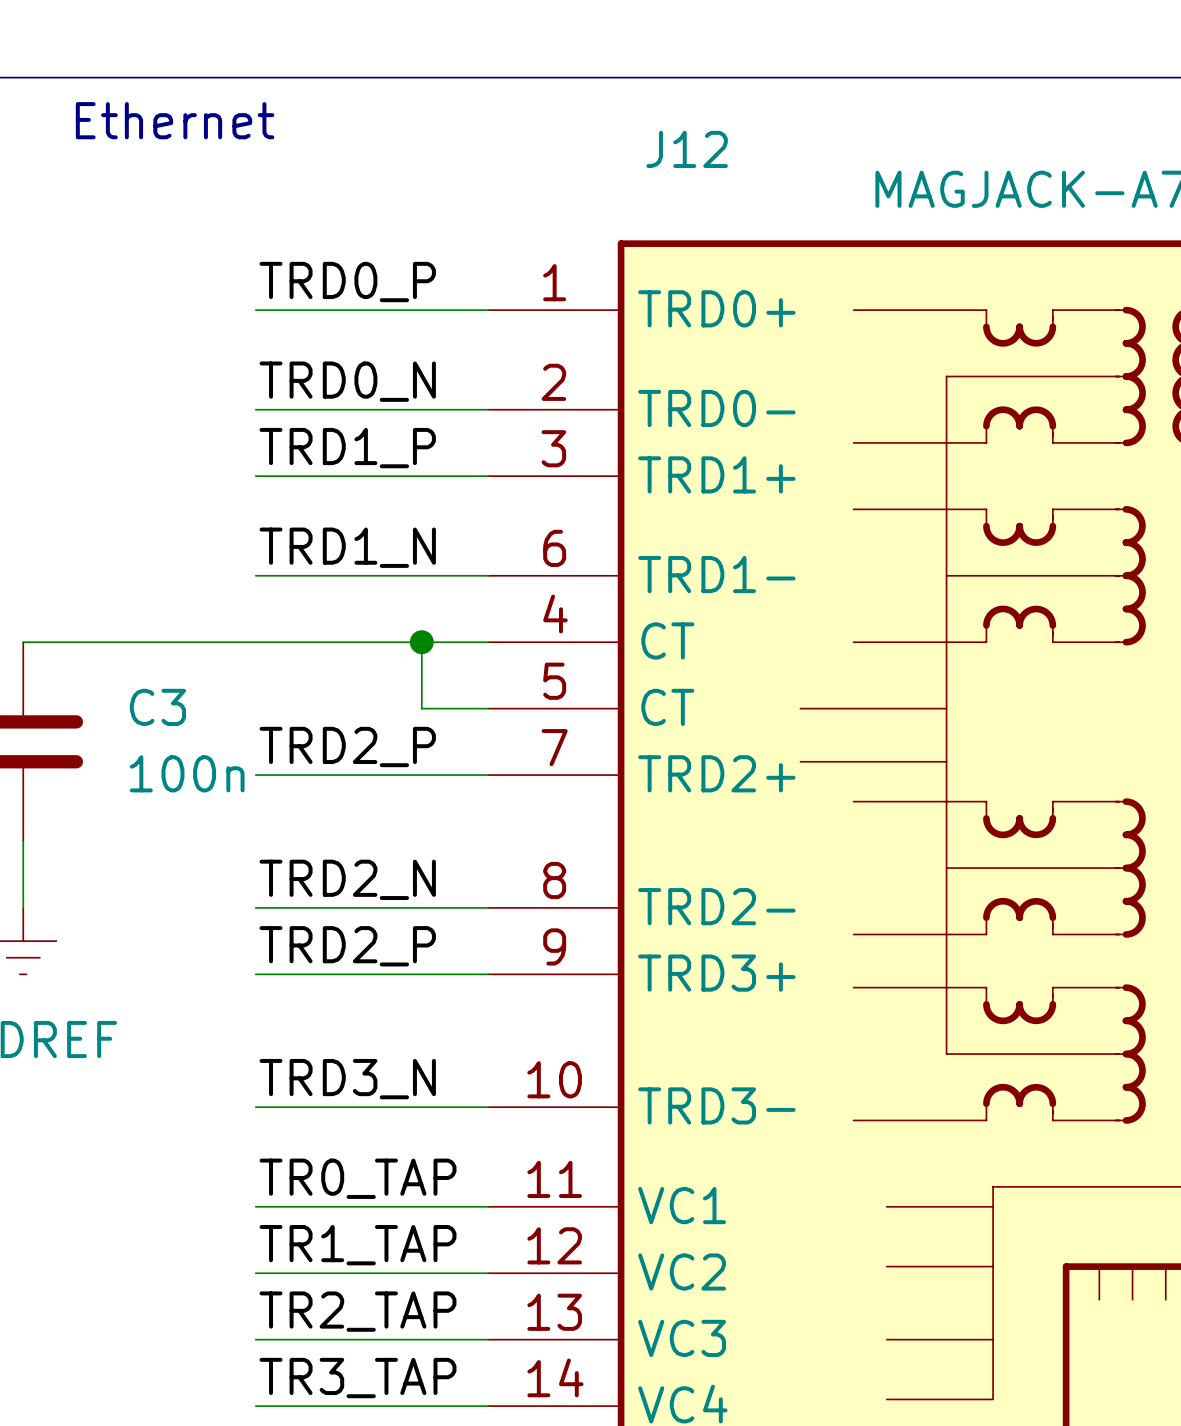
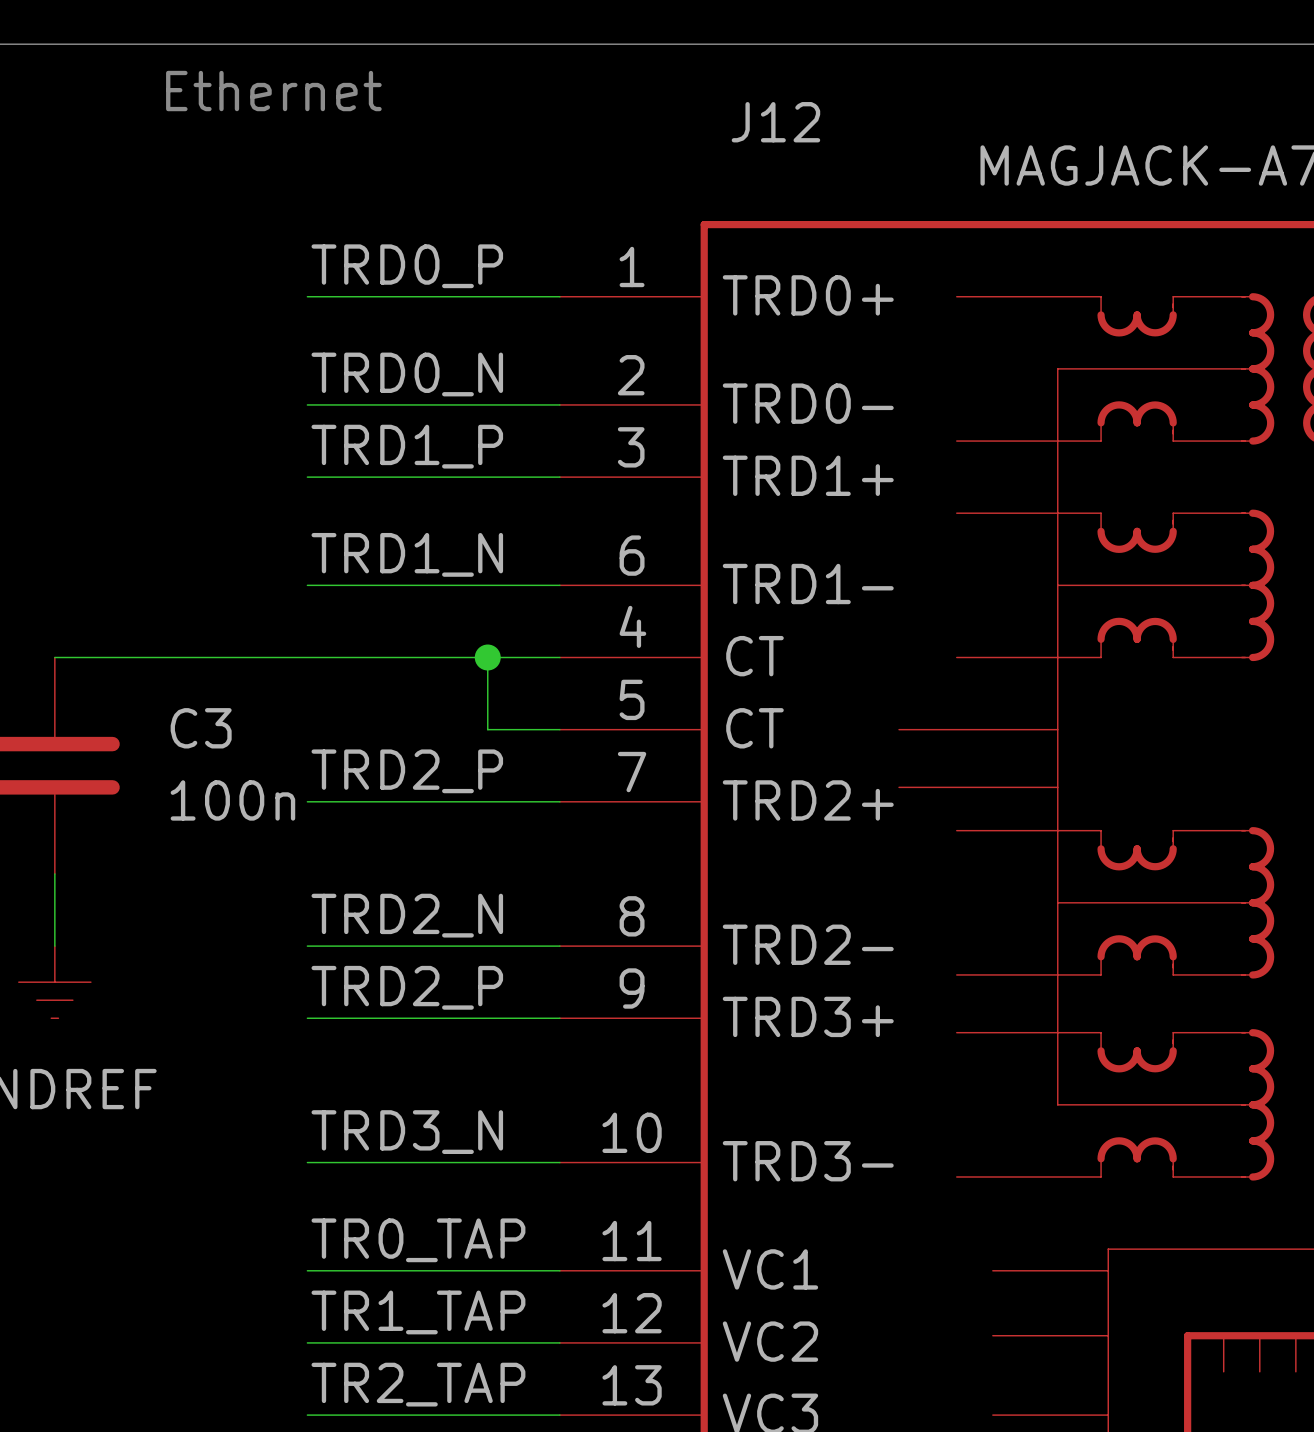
text position: Ethernet (175, 120) -> Ethernet (273, 91)

